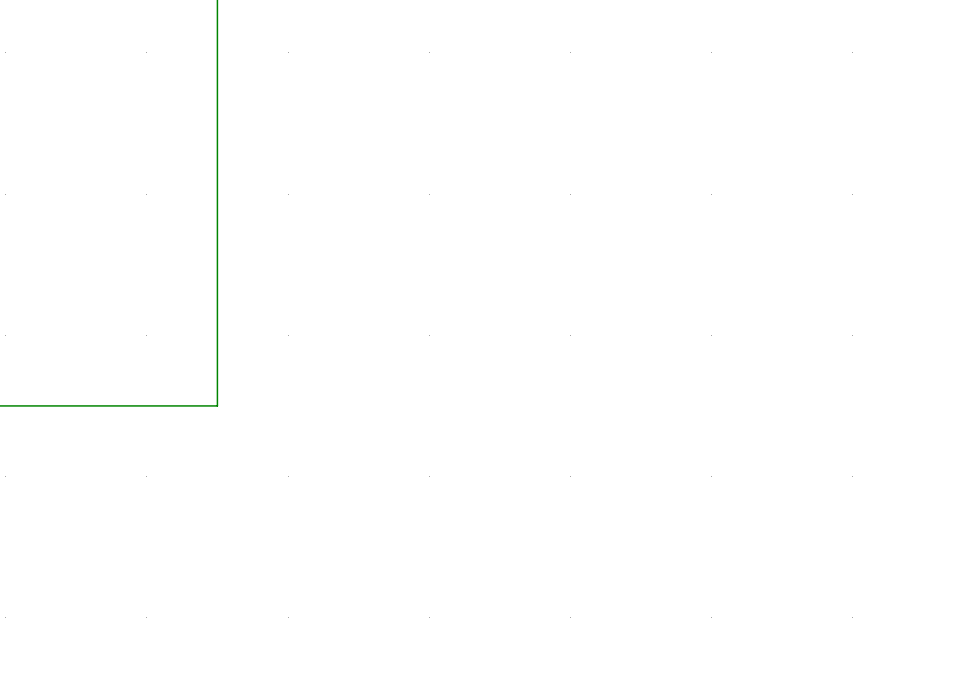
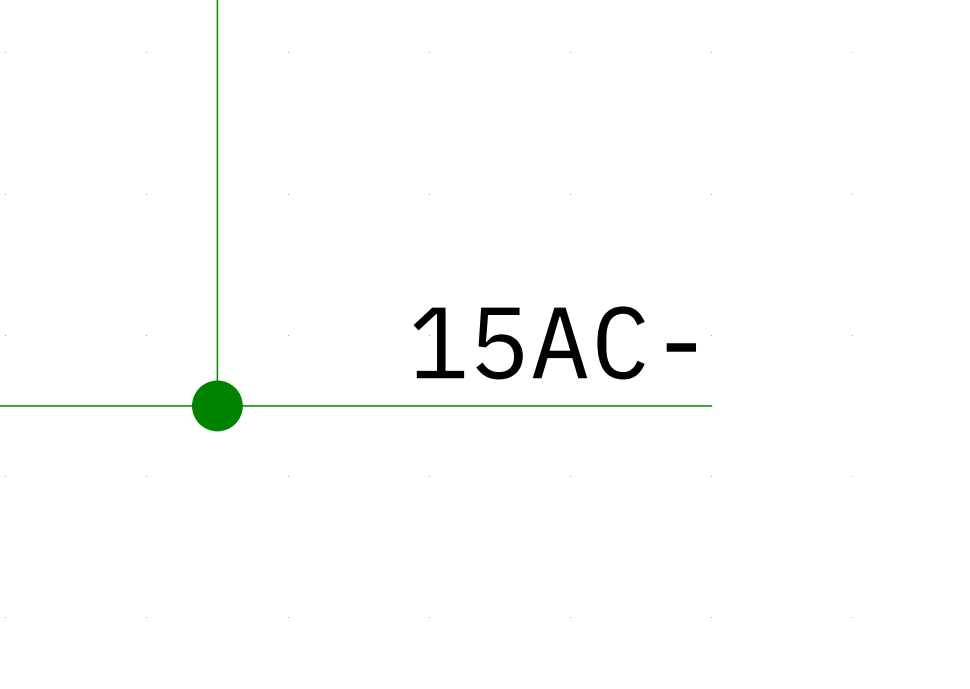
label: none -> 15AC- (554, 342)
wire: none -> (217, 405) (711, 405)
junction: none -> (217, 405)

